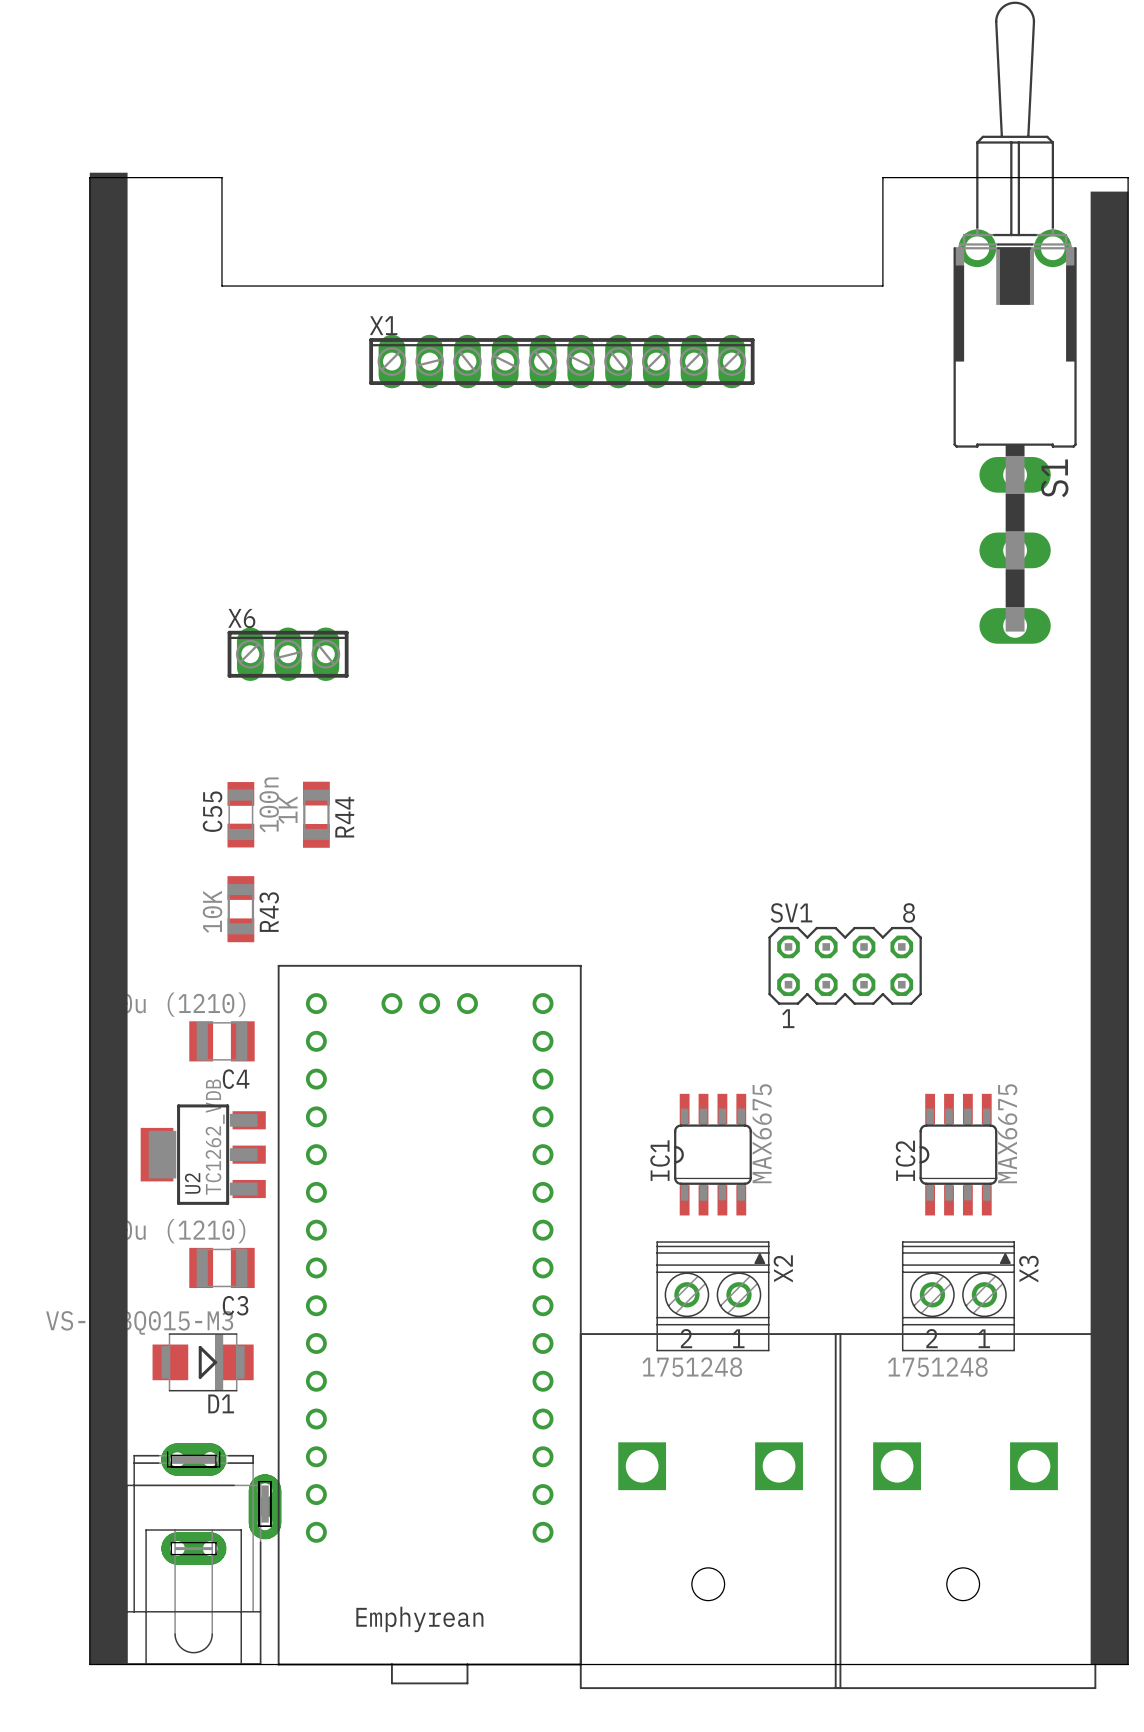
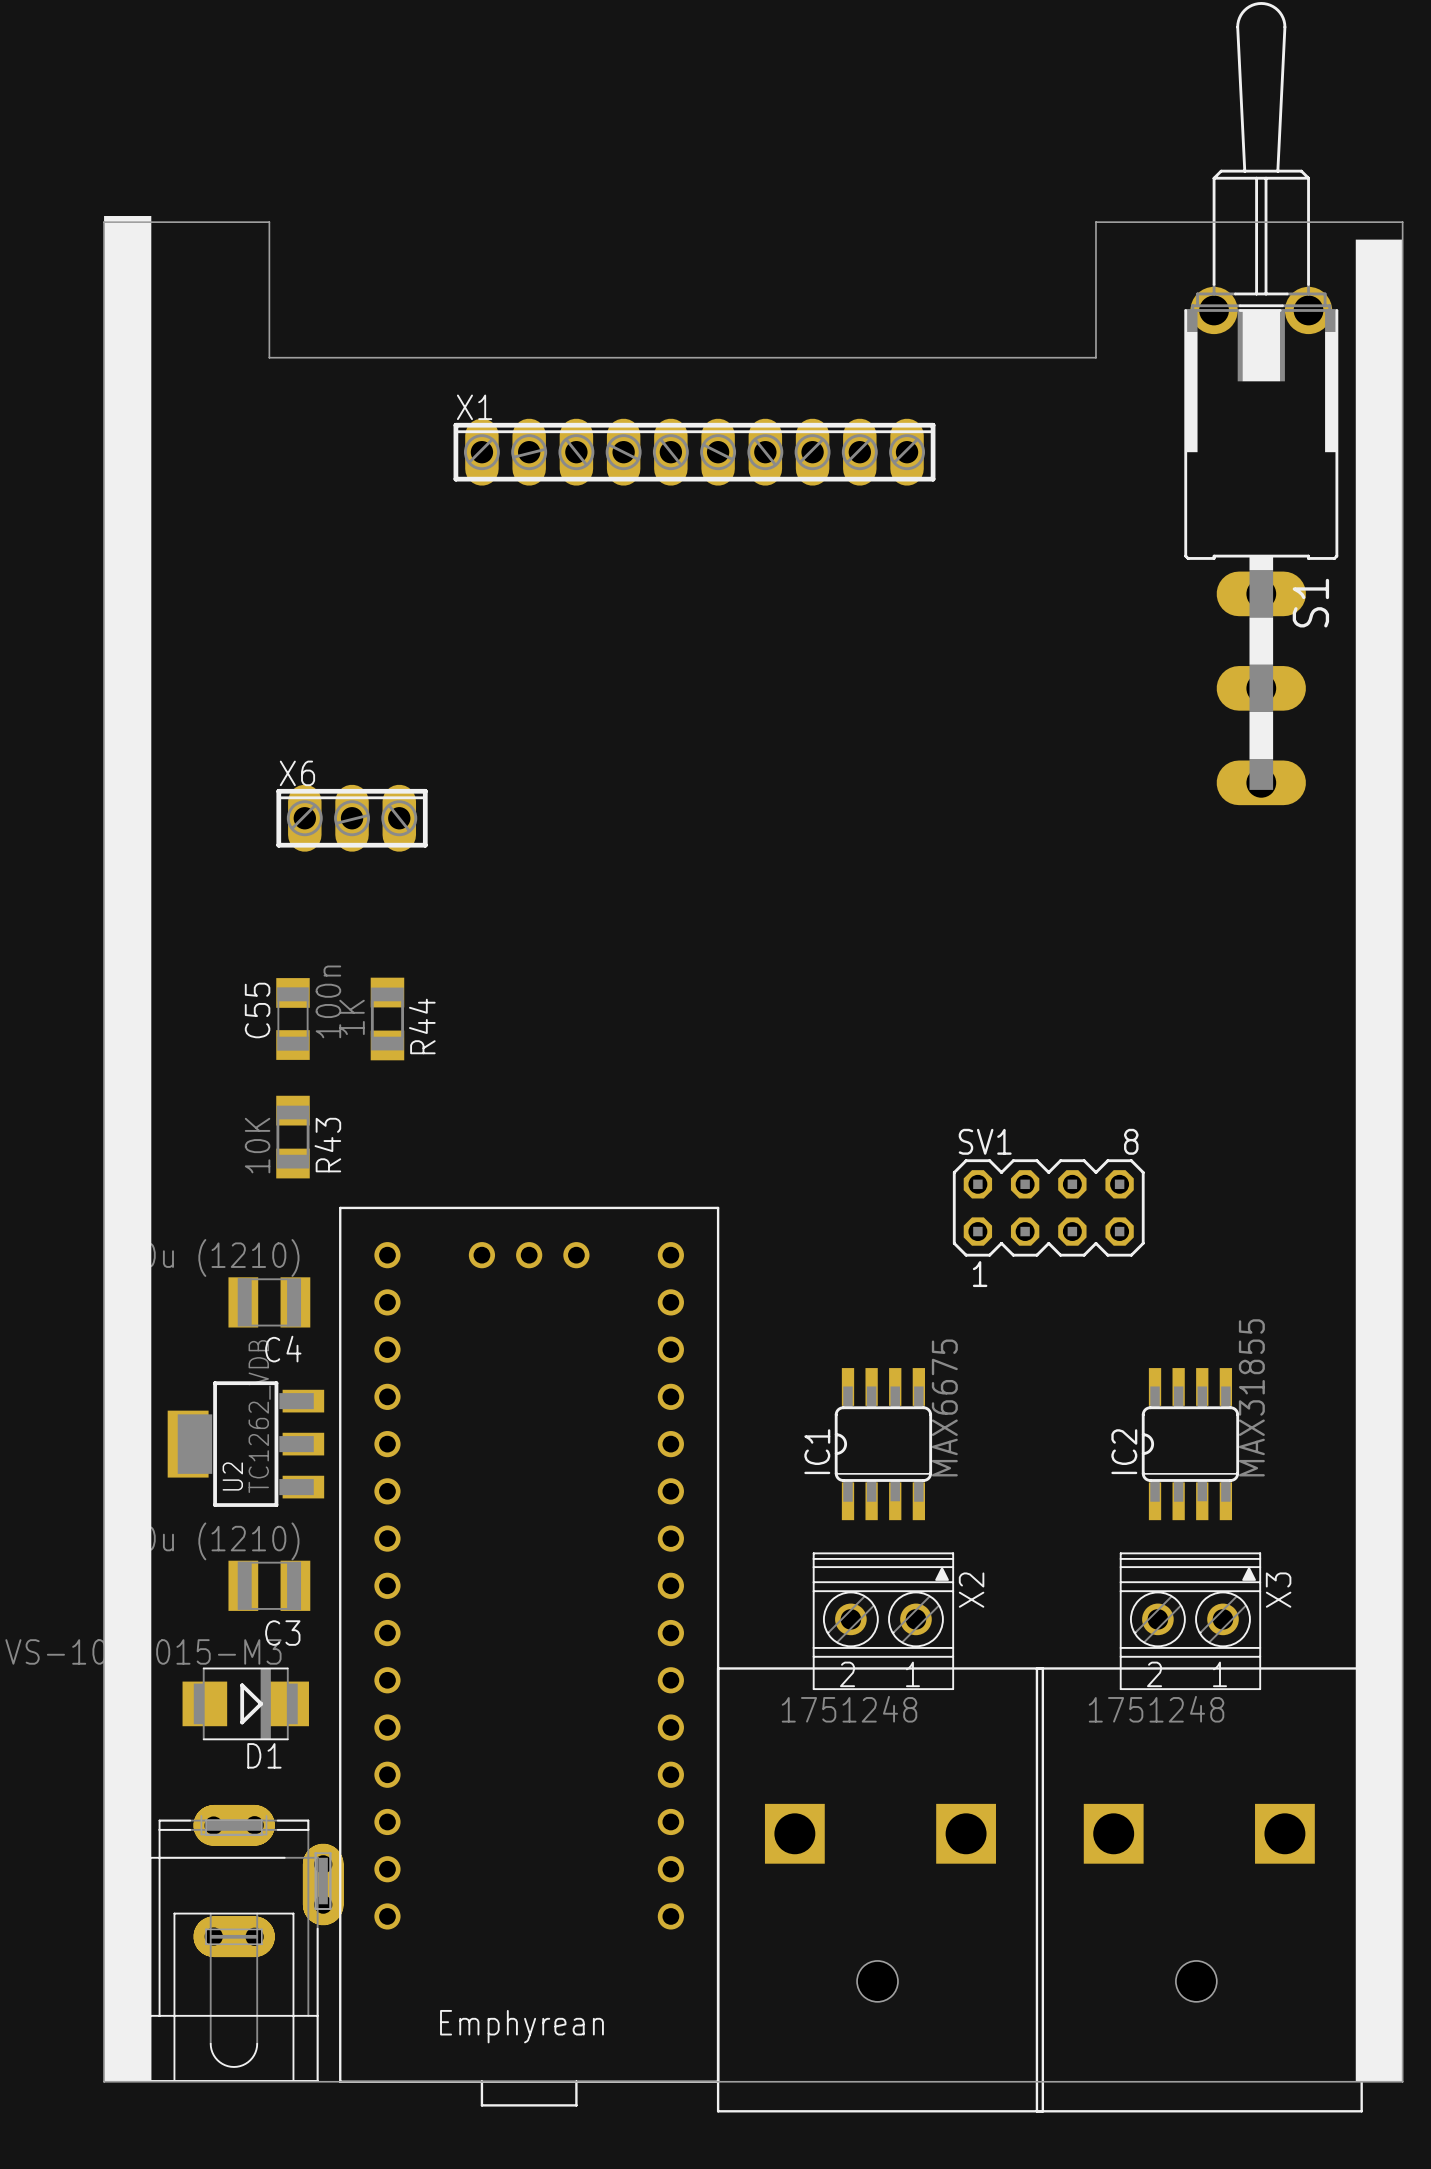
IC2 value: MAX6675 (1007, 1133) -> MAX31855 (1251, 1397)

